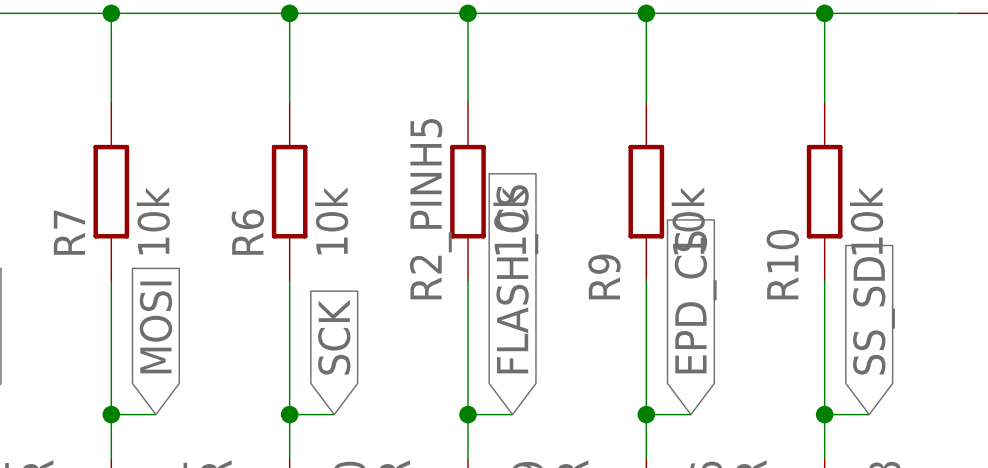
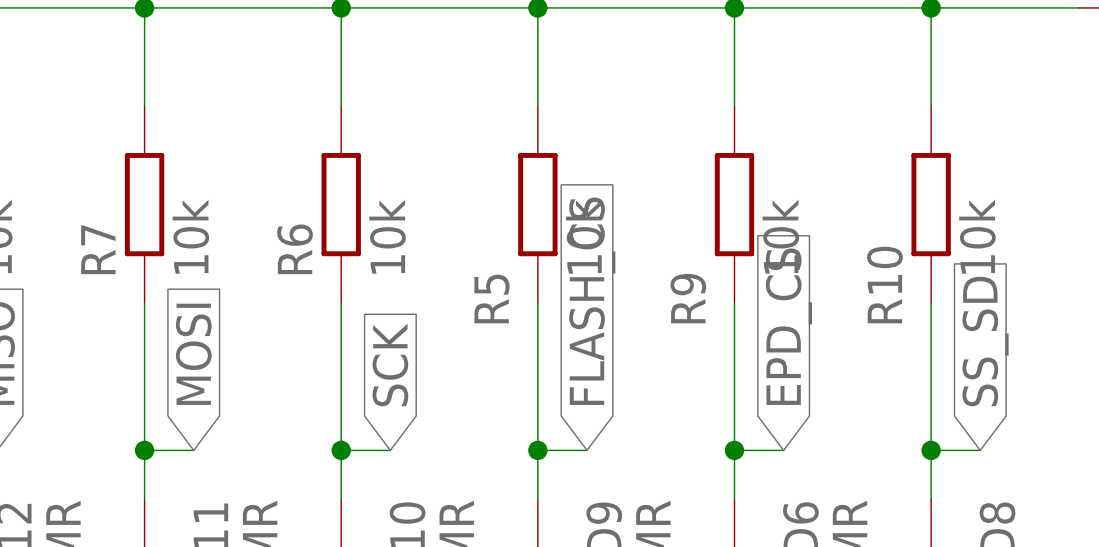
R2_PINH5 name: R2_PINH5 (430, 209) -> R5 (491, 298)

